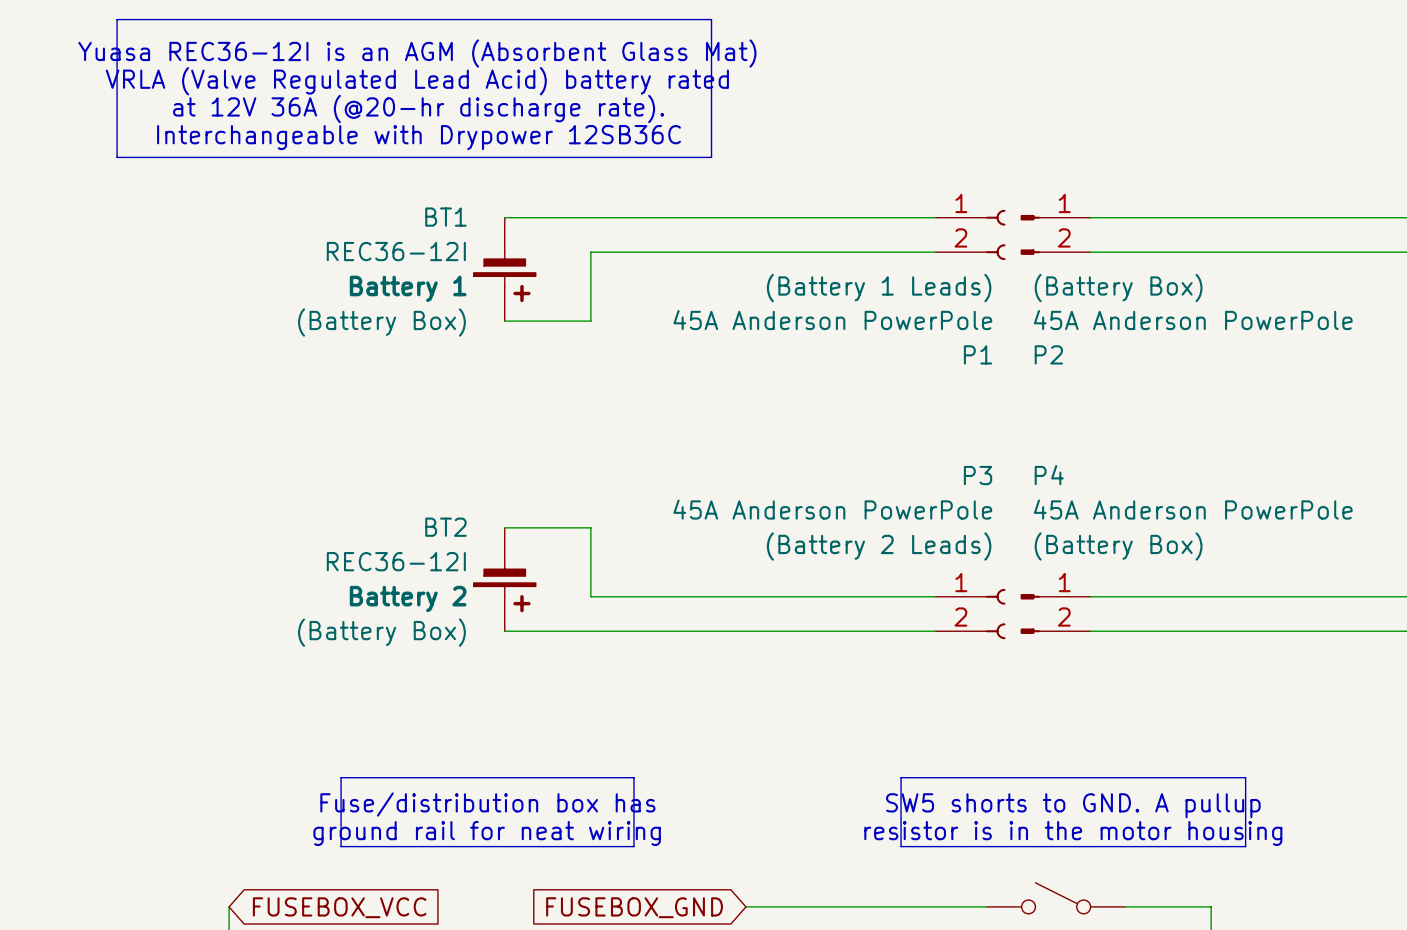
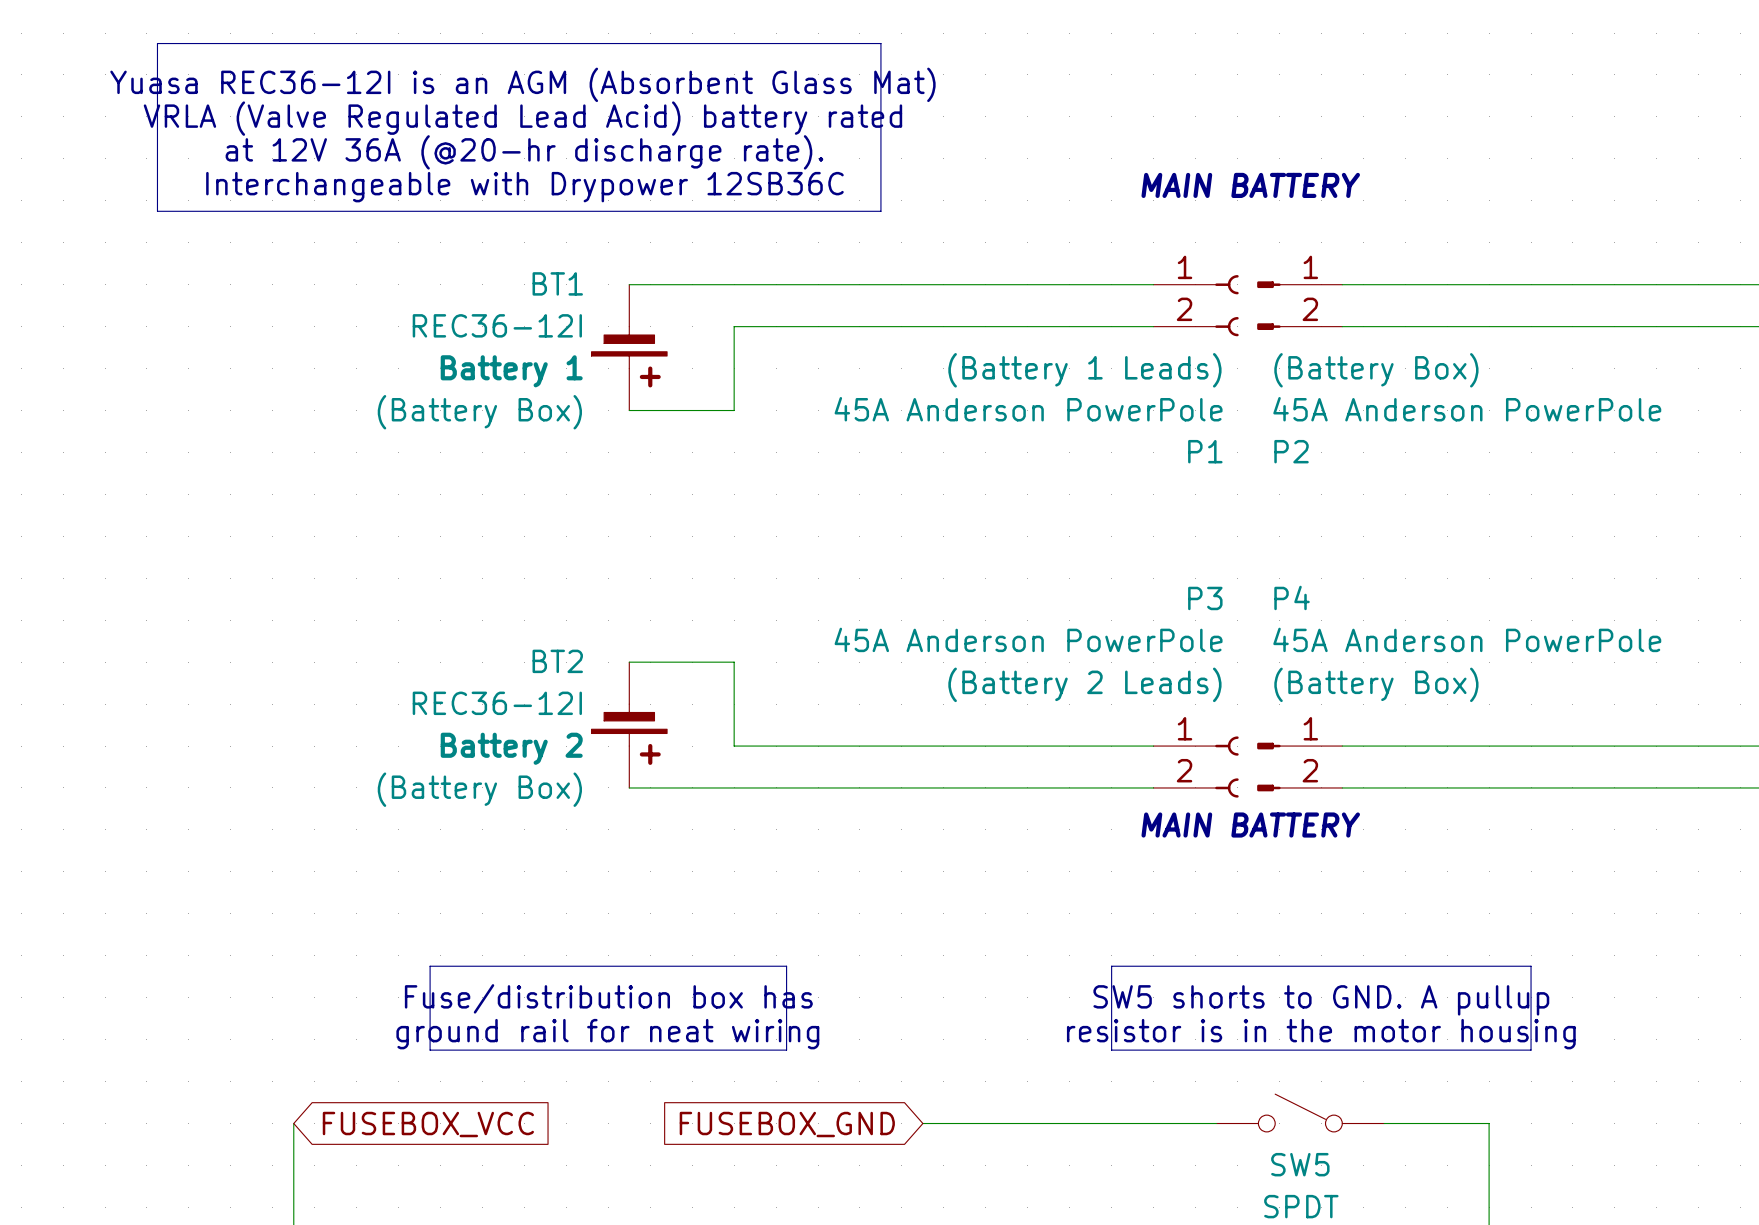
text: none -> MAIN BATTERY (1250, 185)
text: none -> MAIN BATTERY (1250, 825)

